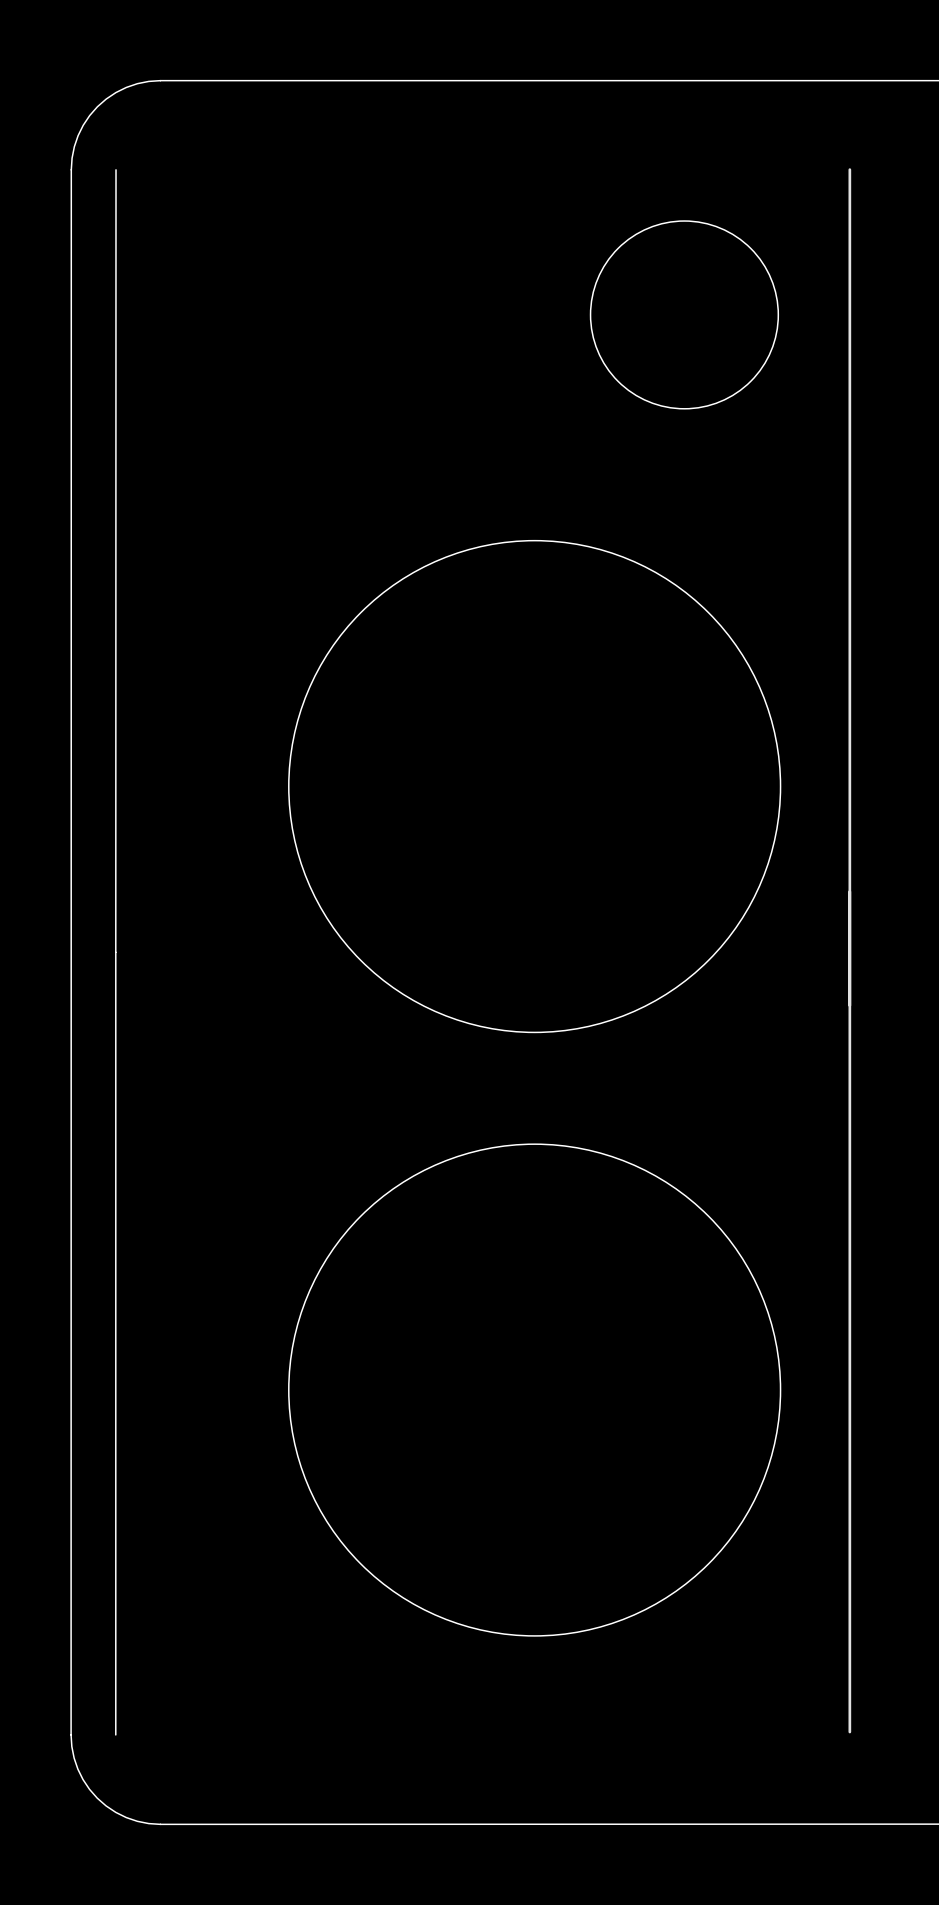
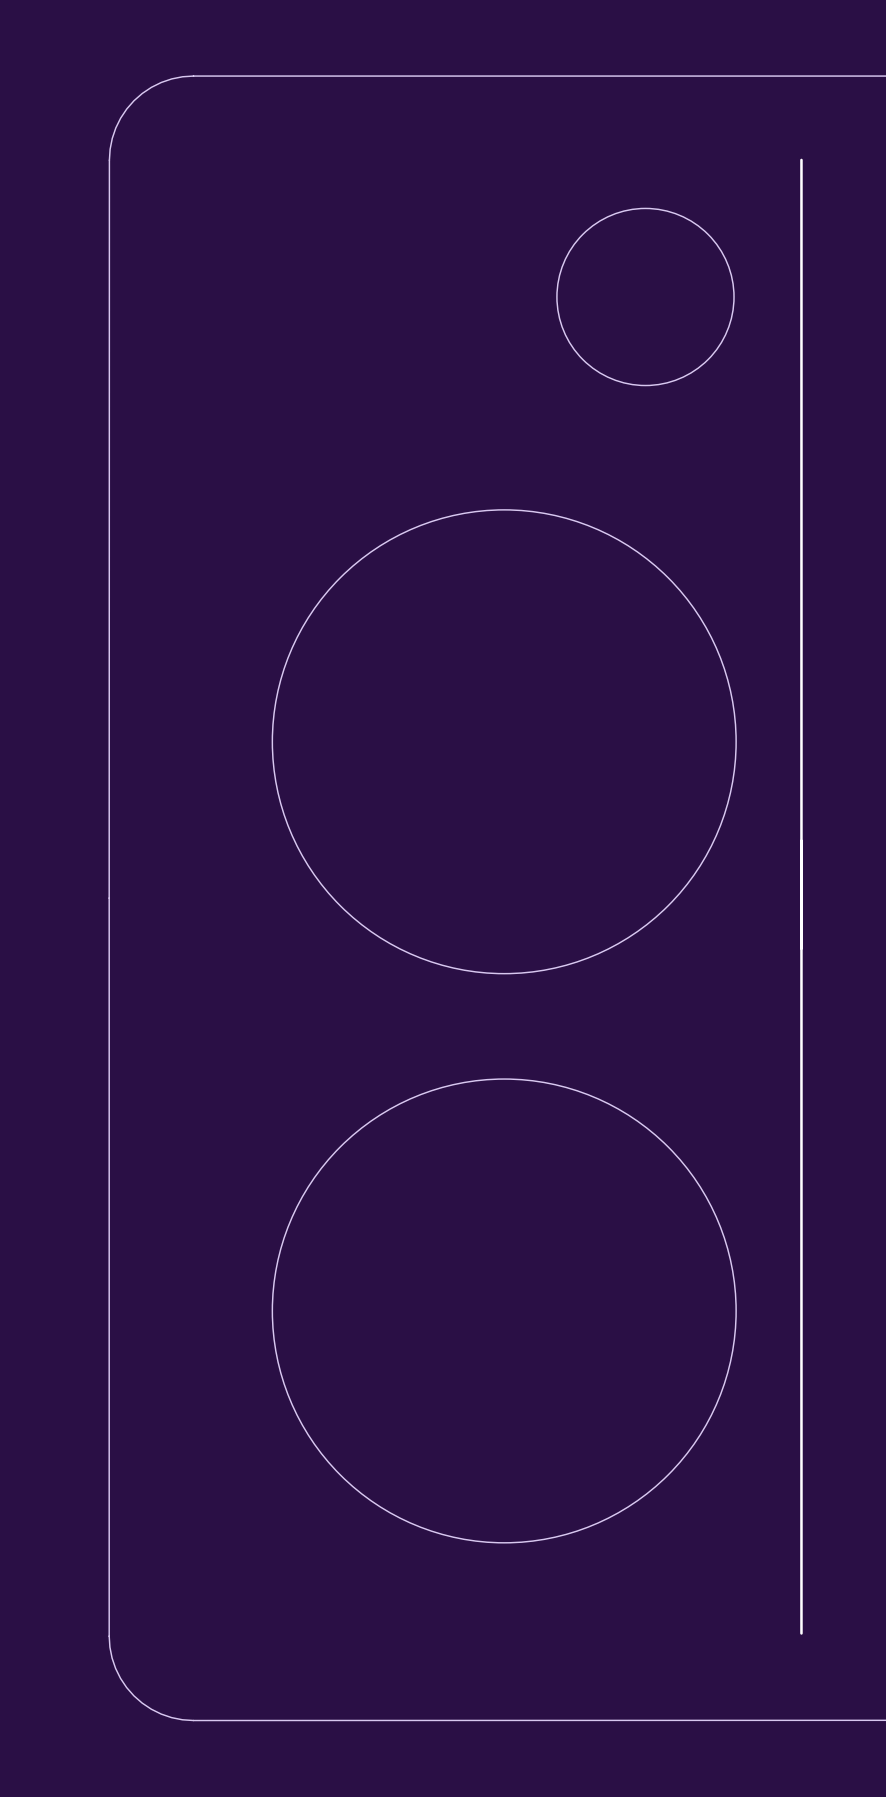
board edge: (205, 80) (148, 81) (137, 83) (115, 92) (97, 106) (89, 115) (78, 135) (72, 158) (71, 1734) (74, 1758) (83, 1779) (97, 1798) (115, 1812) (126, 1817) (148, 1823) (205, 1824) -> (109, 1636) (115, 1668) (133, 1695) (161, 1714) (193, 1720)
board edge: none -> (193, 76) (161, 82) (134, 100) (115, 127) (109, 160)

